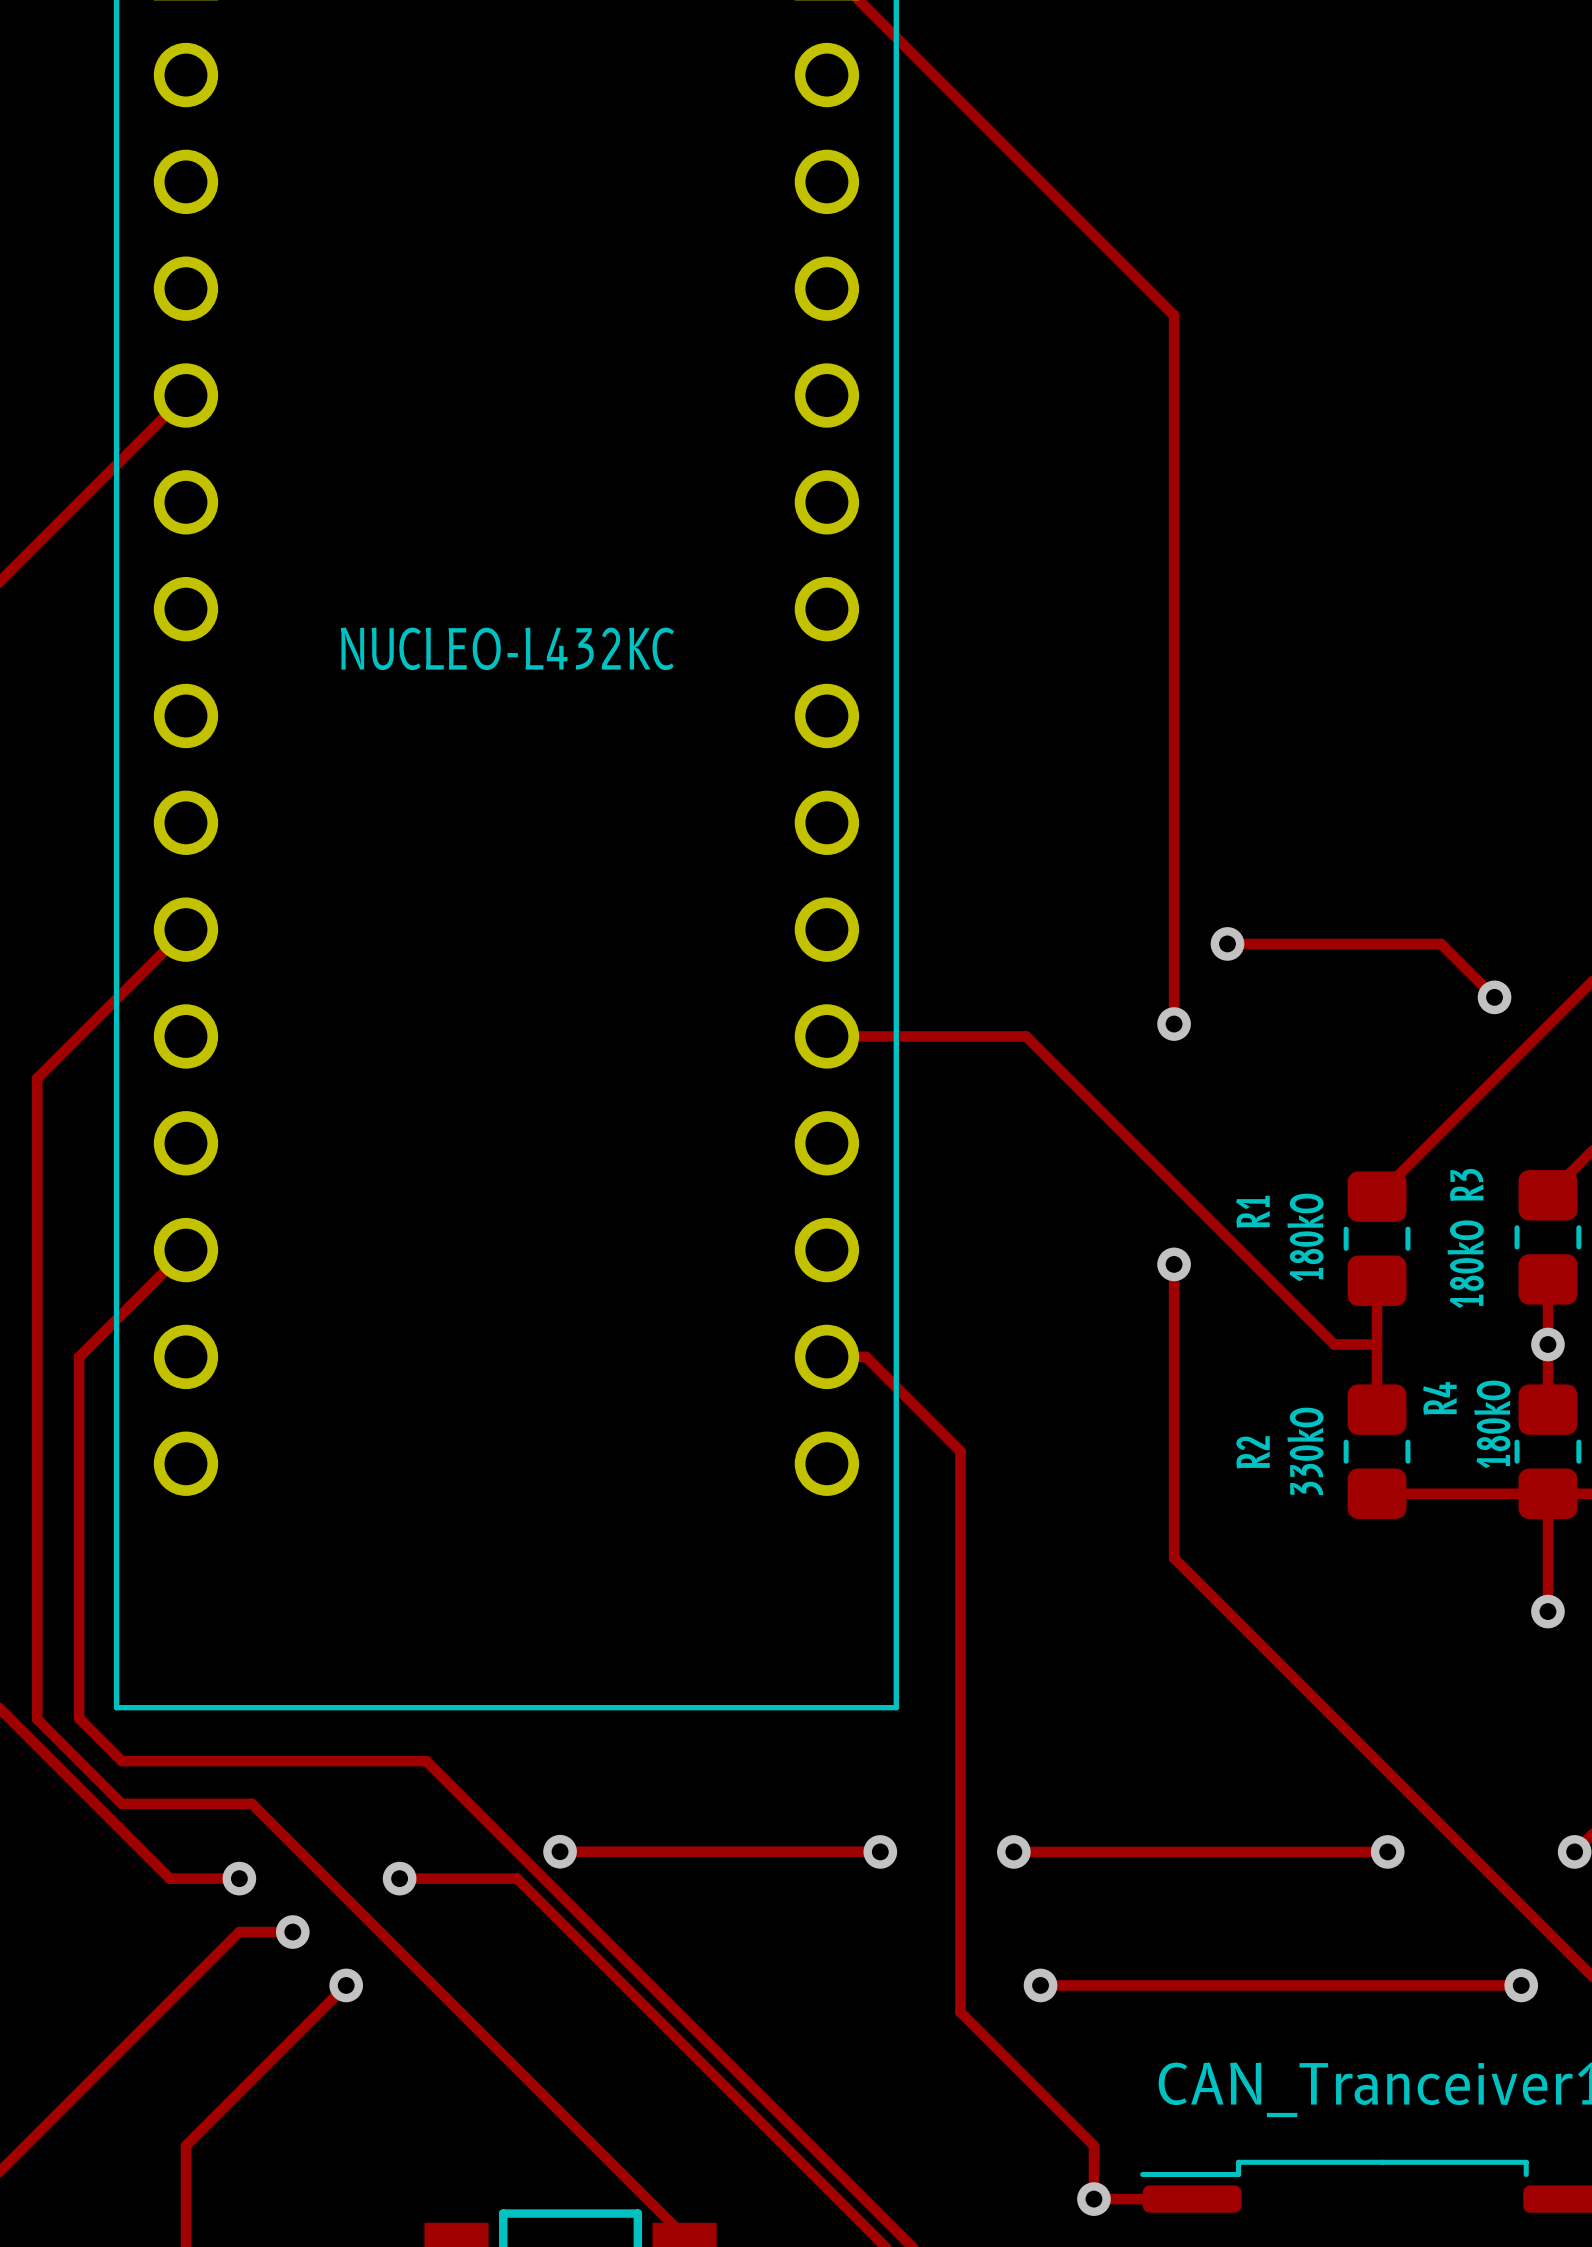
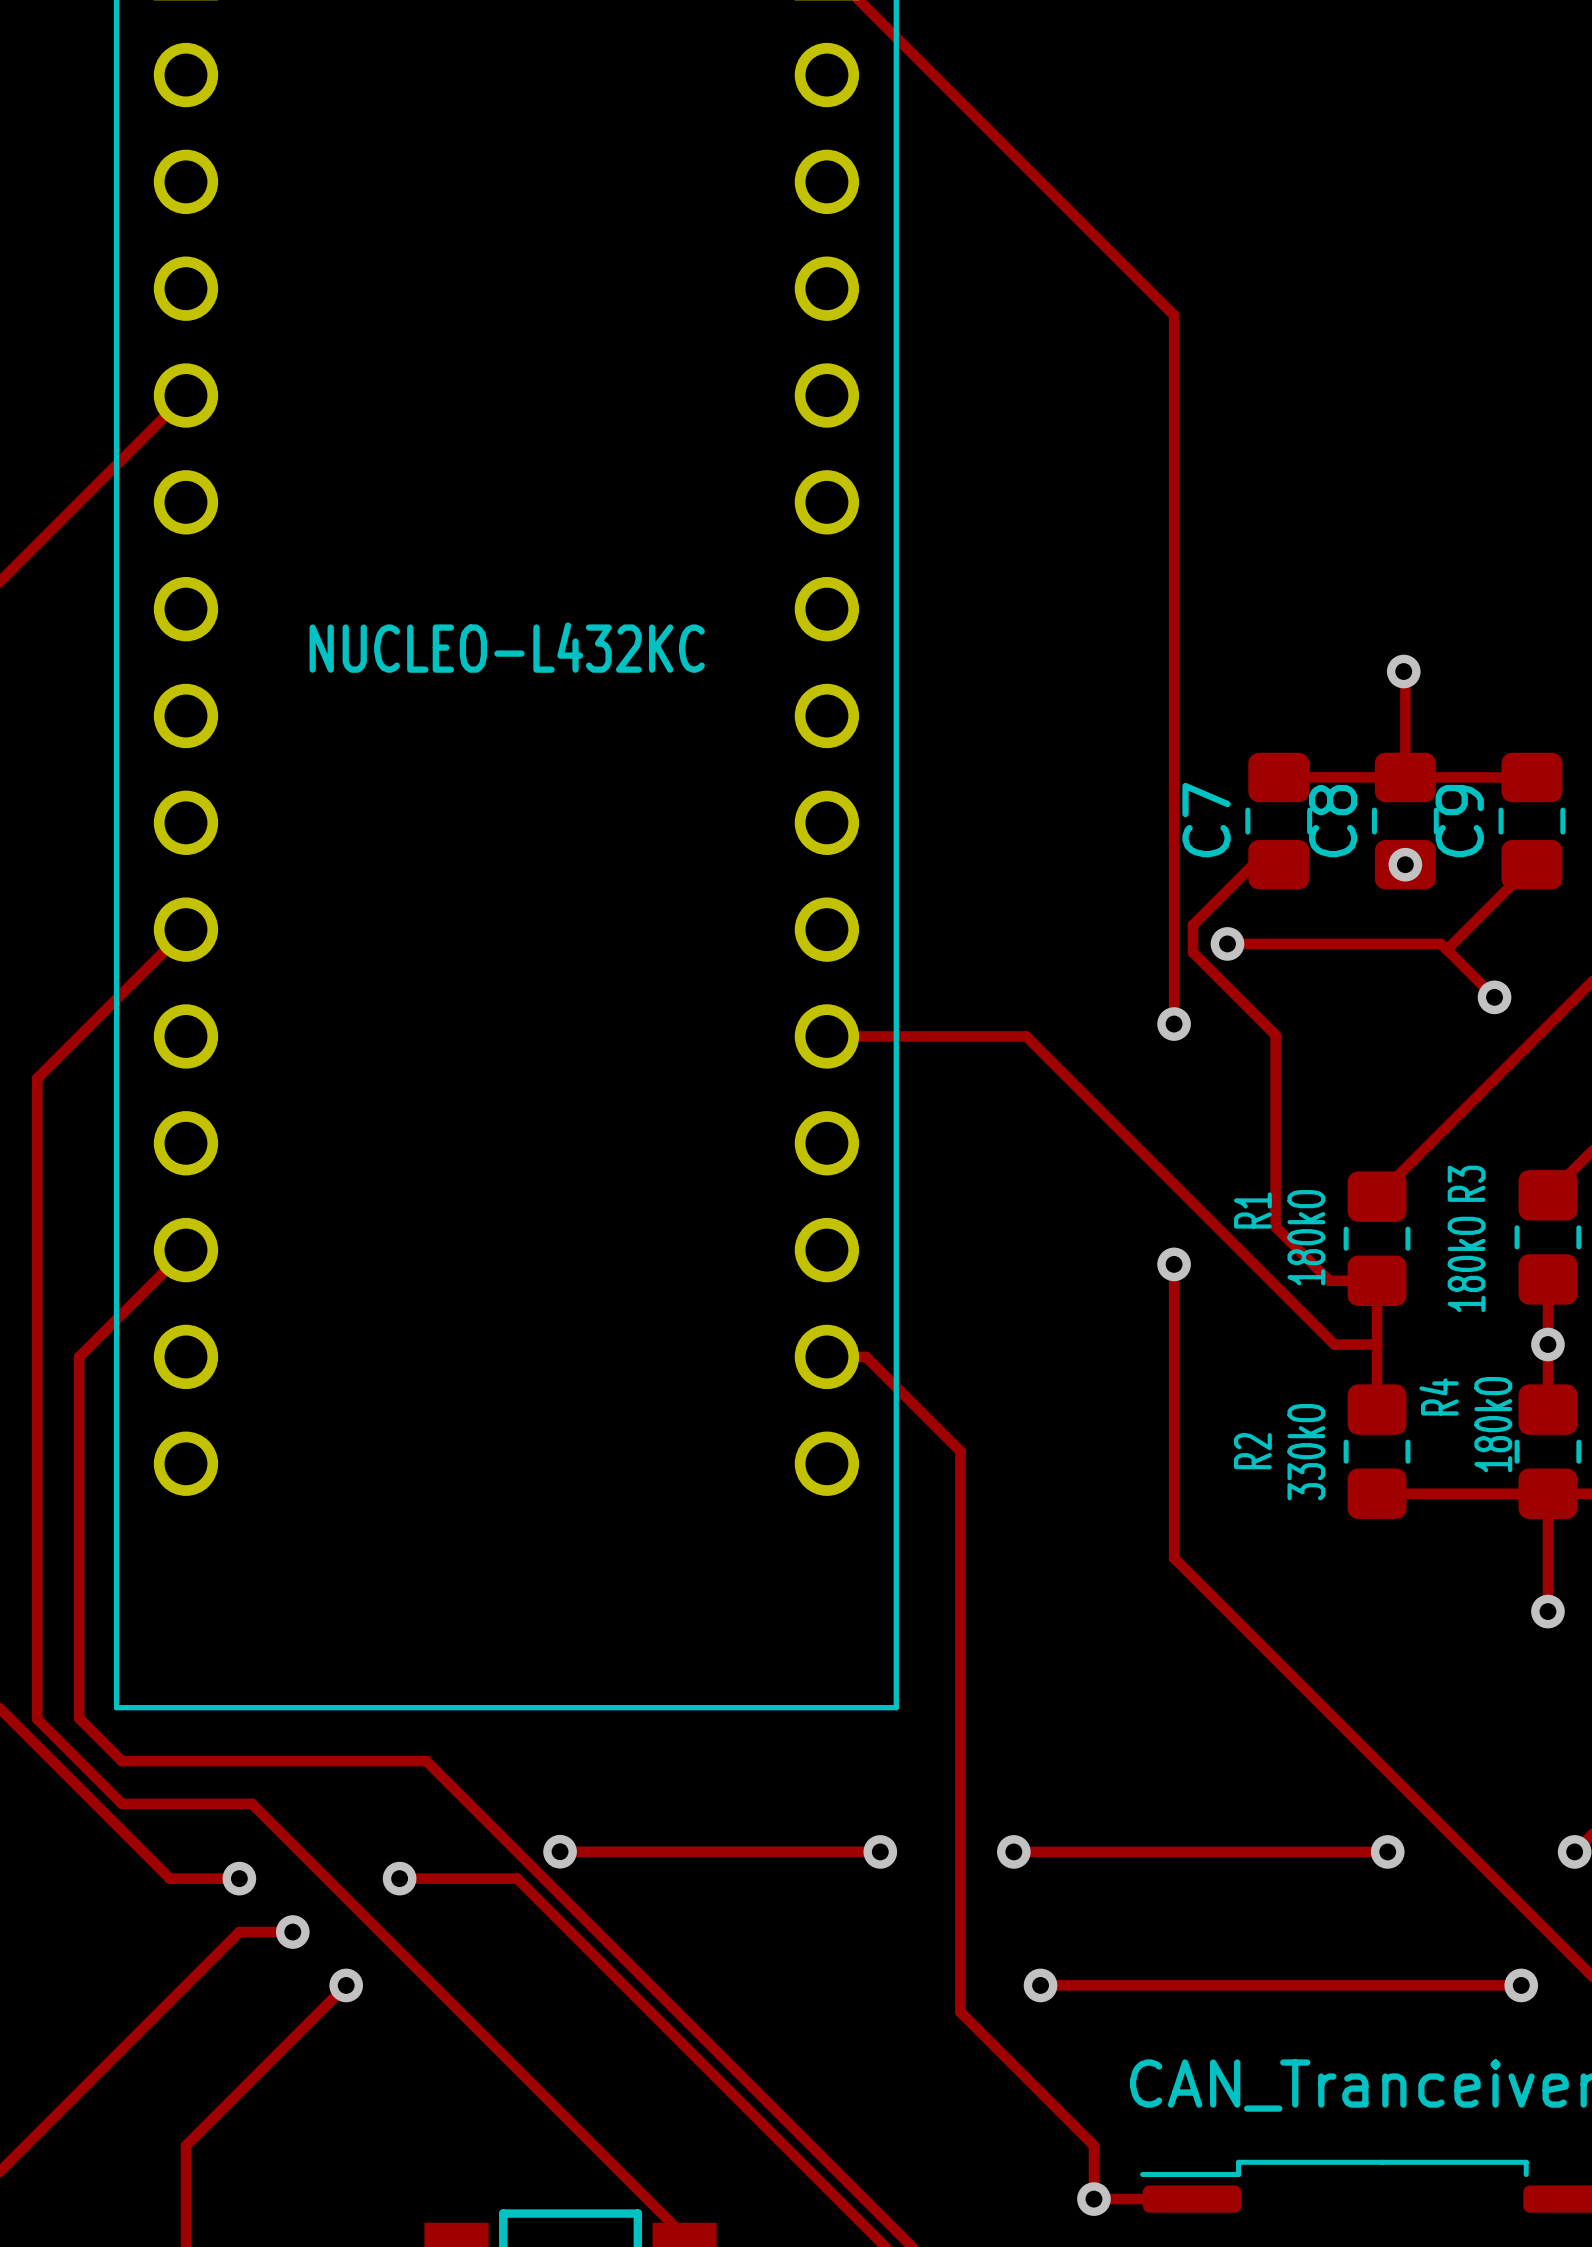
track: none -> (1403, 671) (1405, 673) (1405, 777)
via: none -> (1403, 671)
track: none -> (1278, 777) (1531, 777)
C7: none -> (1278, 821)
C8: none -> (1405, 821)
C9: none -> (1531, 821)
track: none -> (1278, 864) (1253, 864) (1193, 925) (1193, 952) (1275, 1035) (1275, 1227) (1329, 1280) (1377, 1280)
via: none -> (1405, 864)
track: none -> (1531, 864) (1446, 949)

